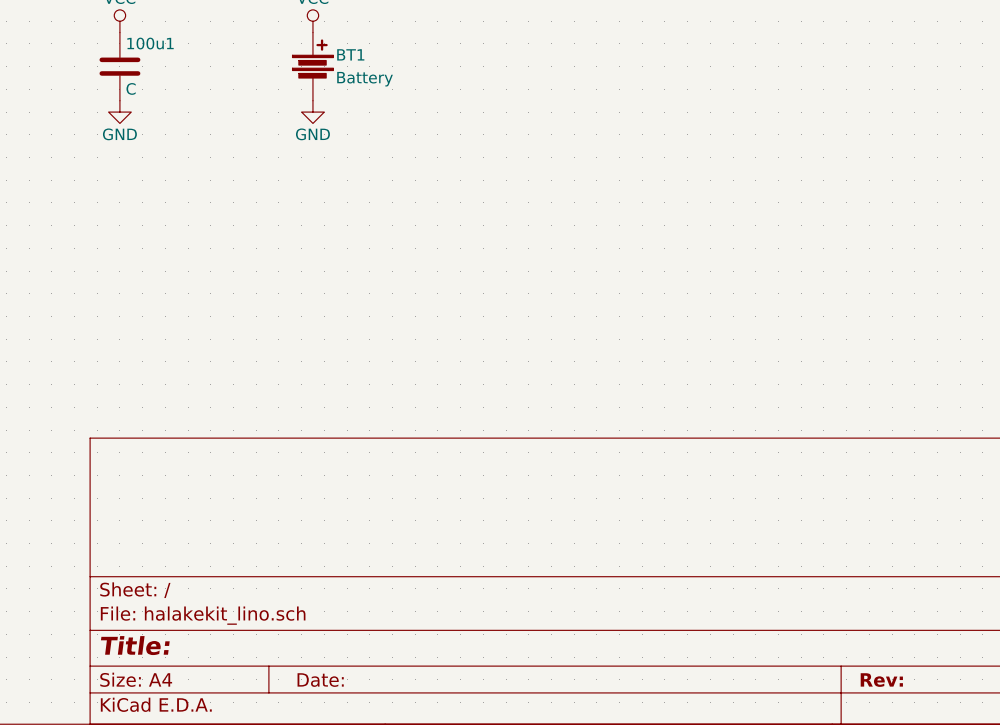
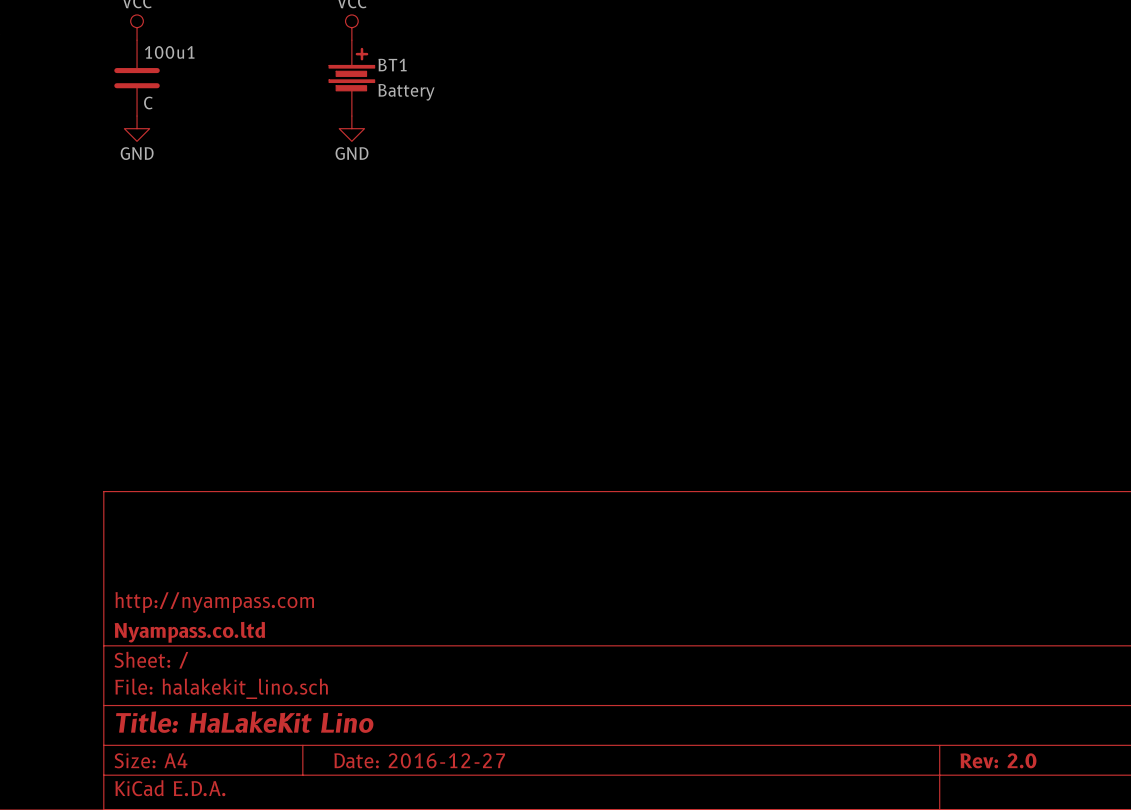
title block: none -> http://nyampass.com (214, 602)
title block: none -> Nyampass.co.ltd (189, 632)
title block: Title: (135, 645) -> Title: HaLakeKit Lino (244, 722)
title block: Date: (320, 680) -> Date: 2016-12-27 (419, 760)
title block: Rev: (881, 680) -> Rev: 2.0 (998, 760)

